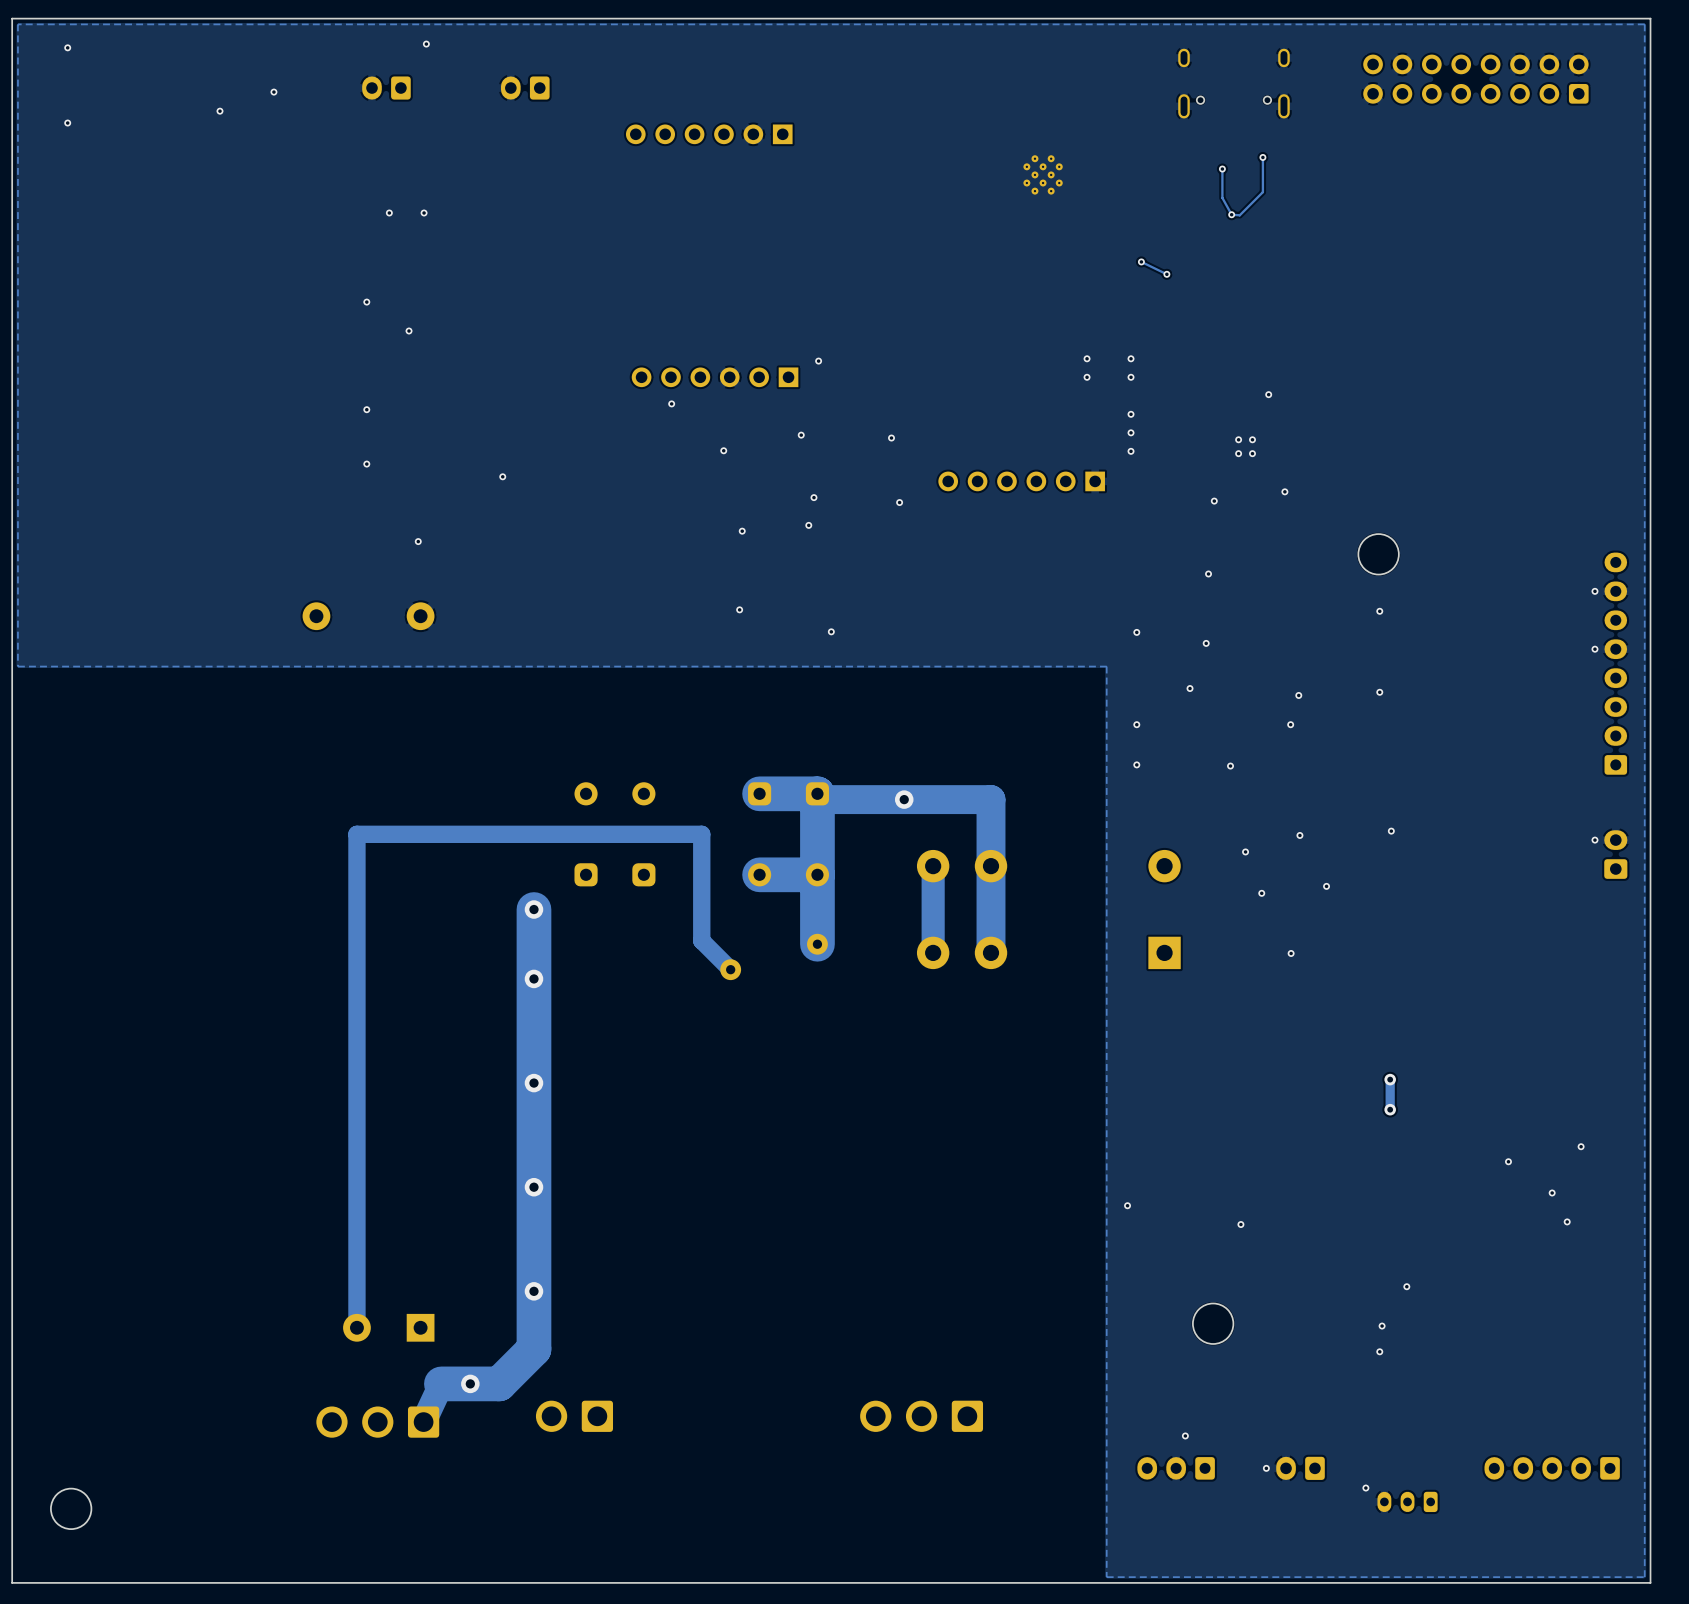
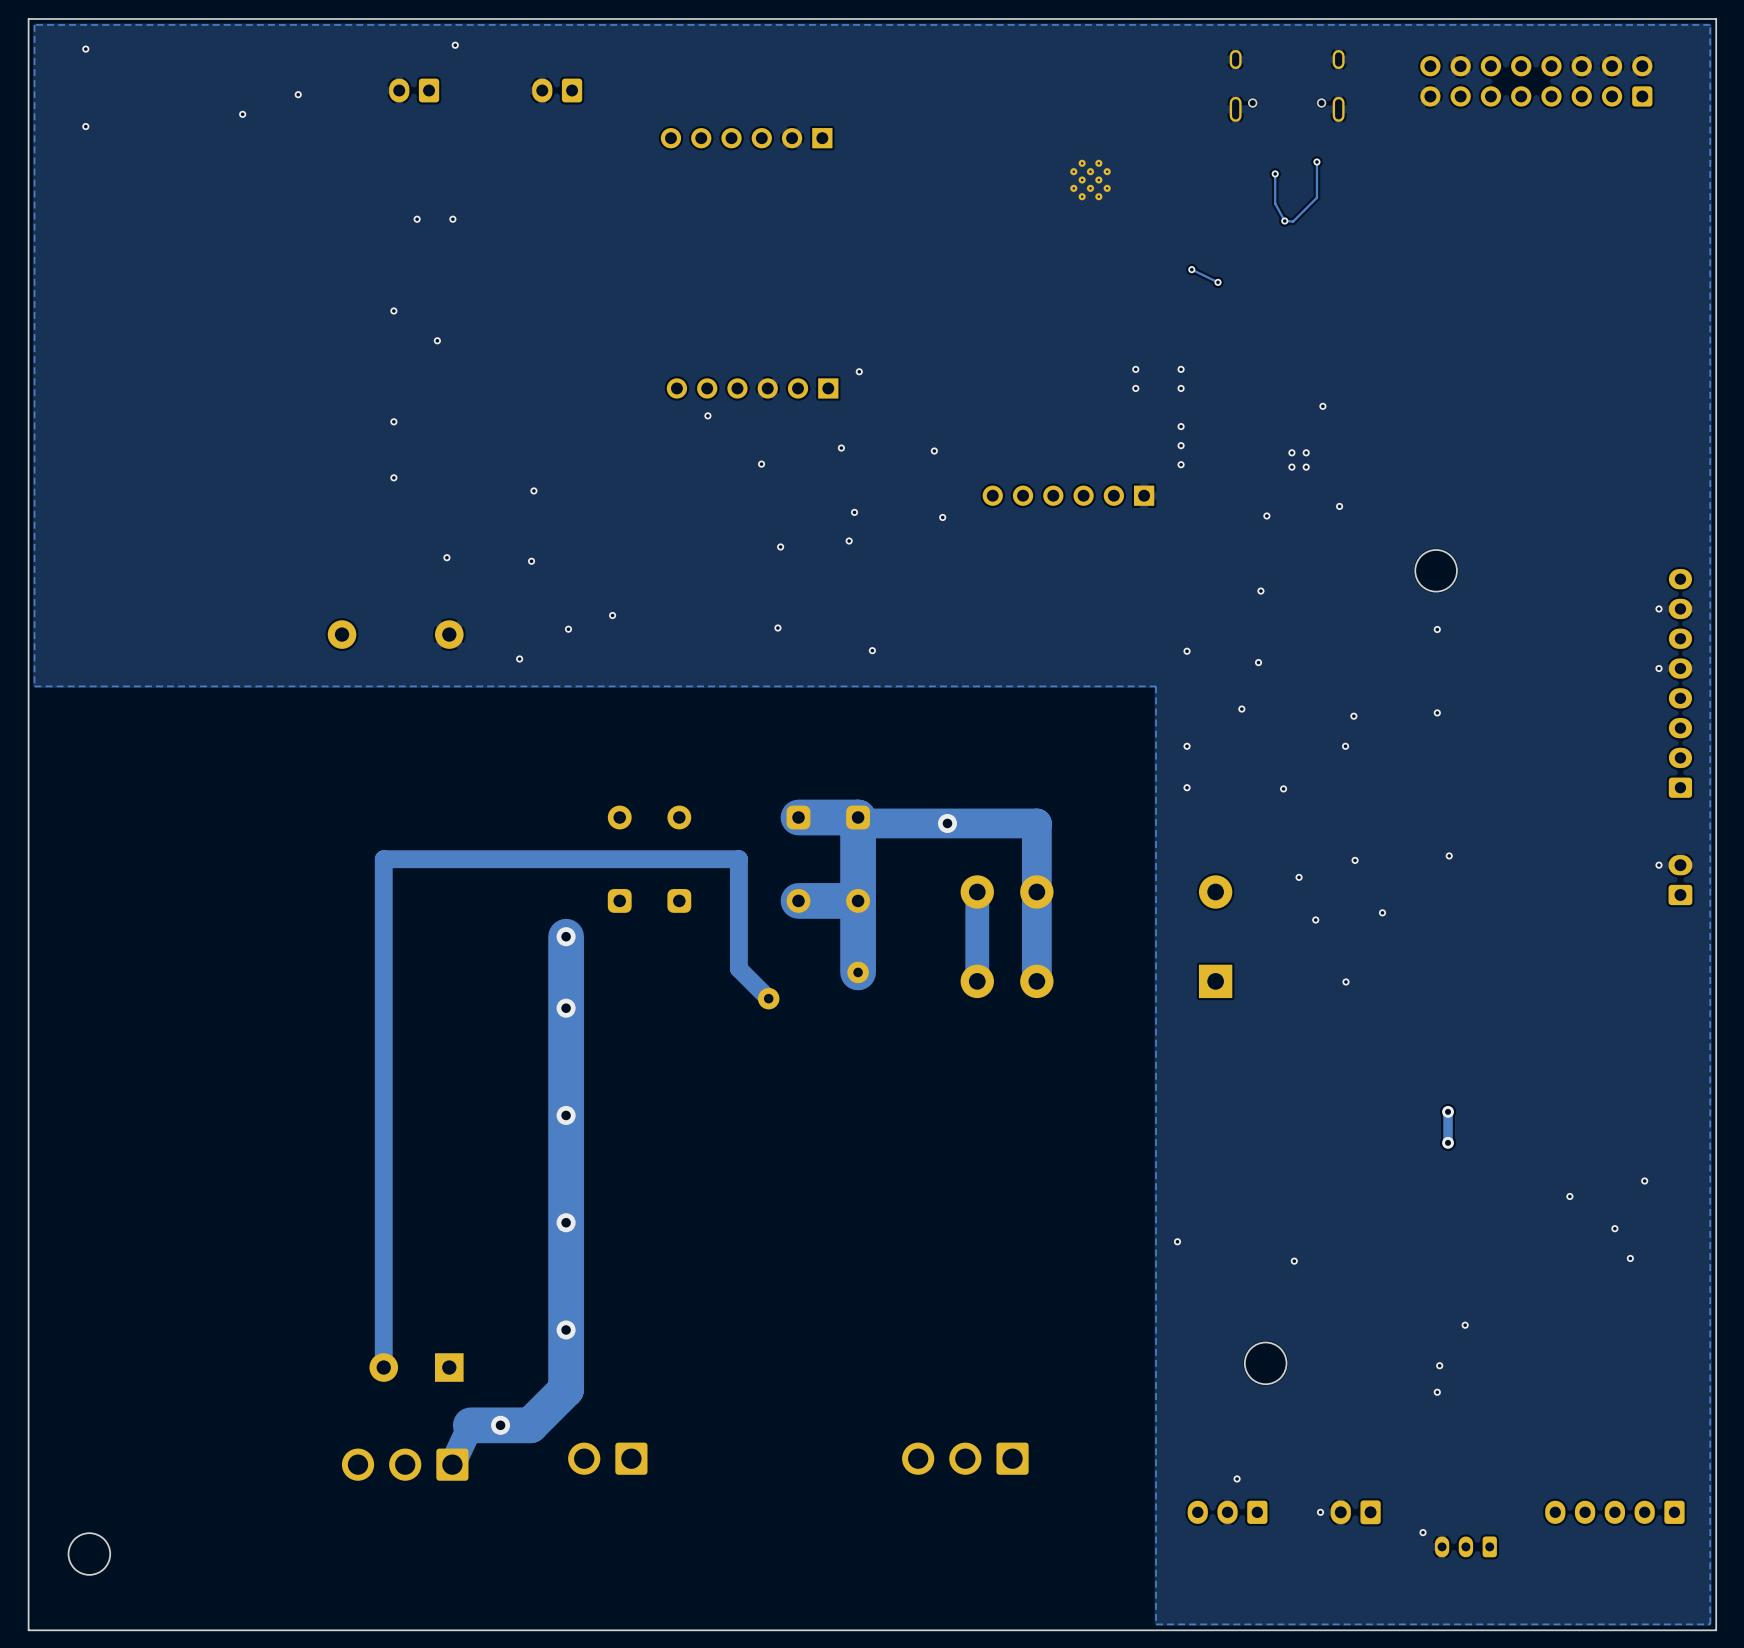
via: none -> (531, 561)
via: none -> (612, 615)
via: none -> (568, 629)
via: none -> (519, 658)

